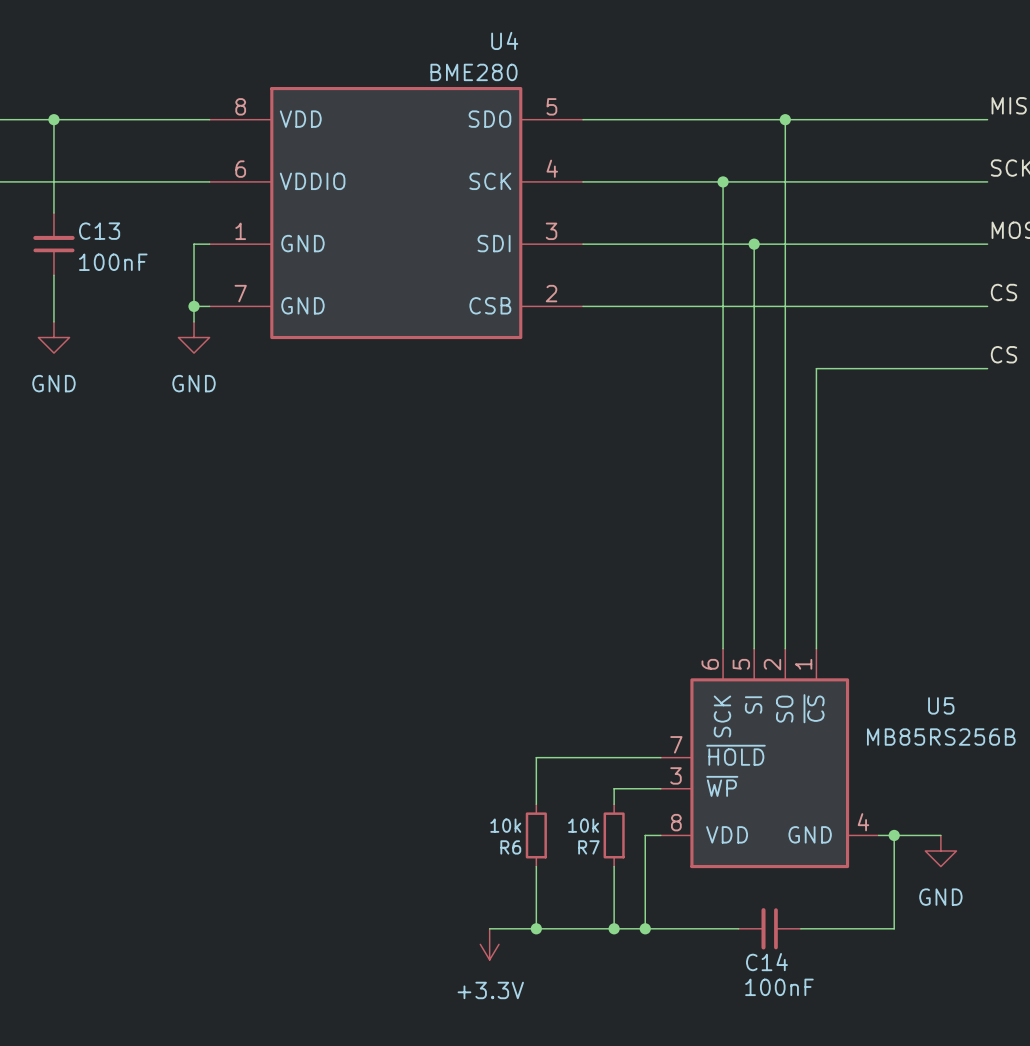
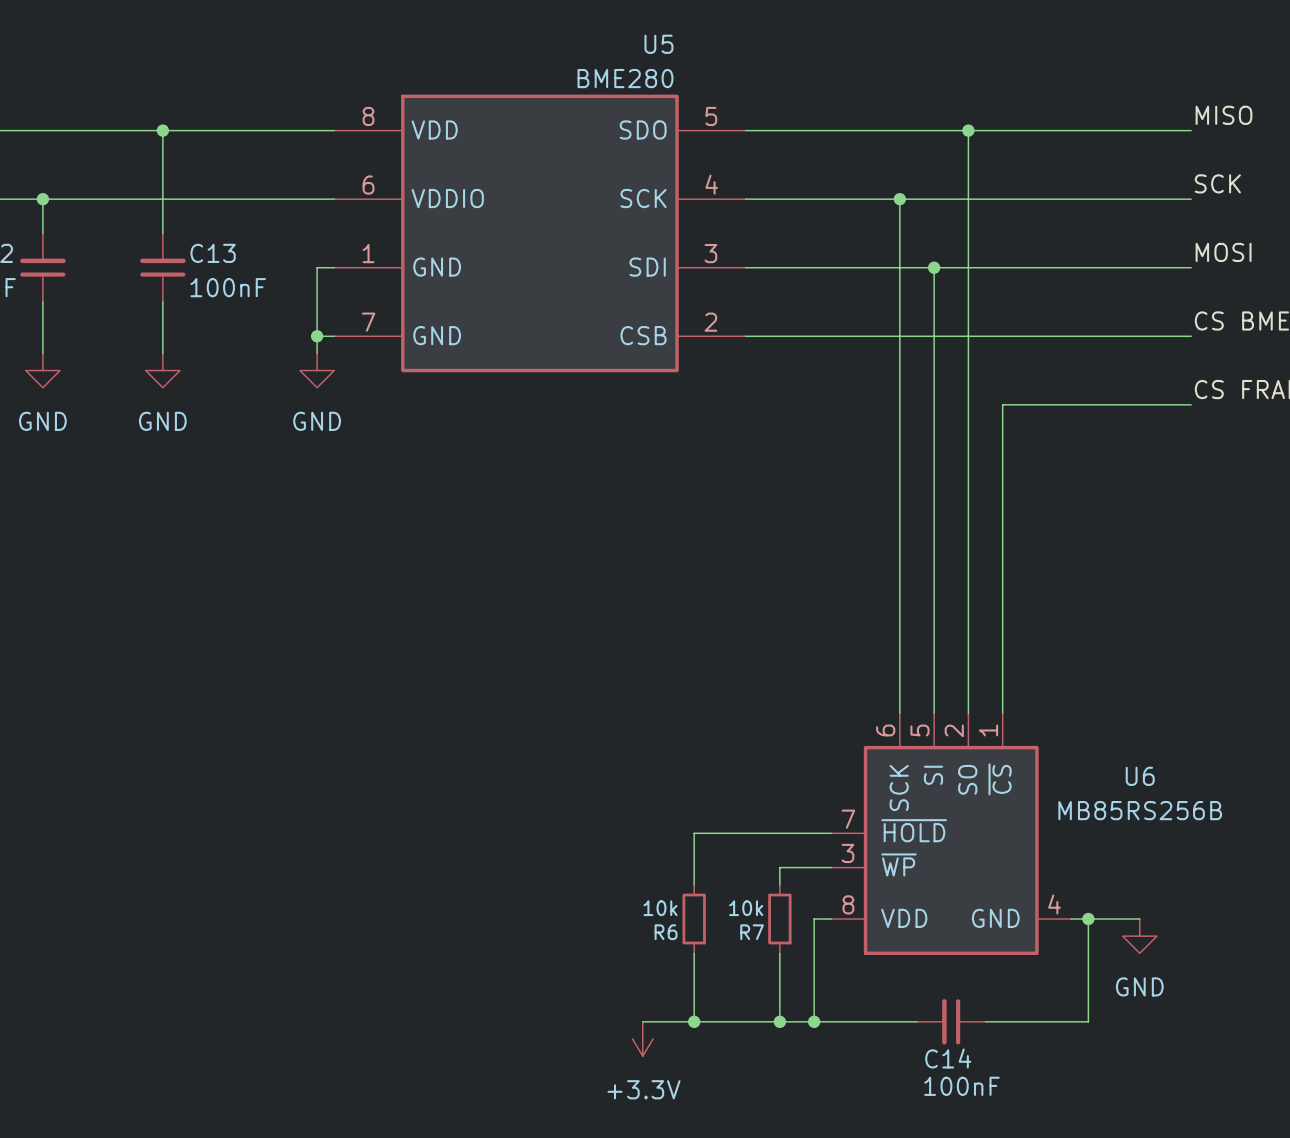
U4 name: U4 (504, 40) -> U5 (658, 44)
U5 name: U5 (941, 705) -> U6 (1140, 776)

